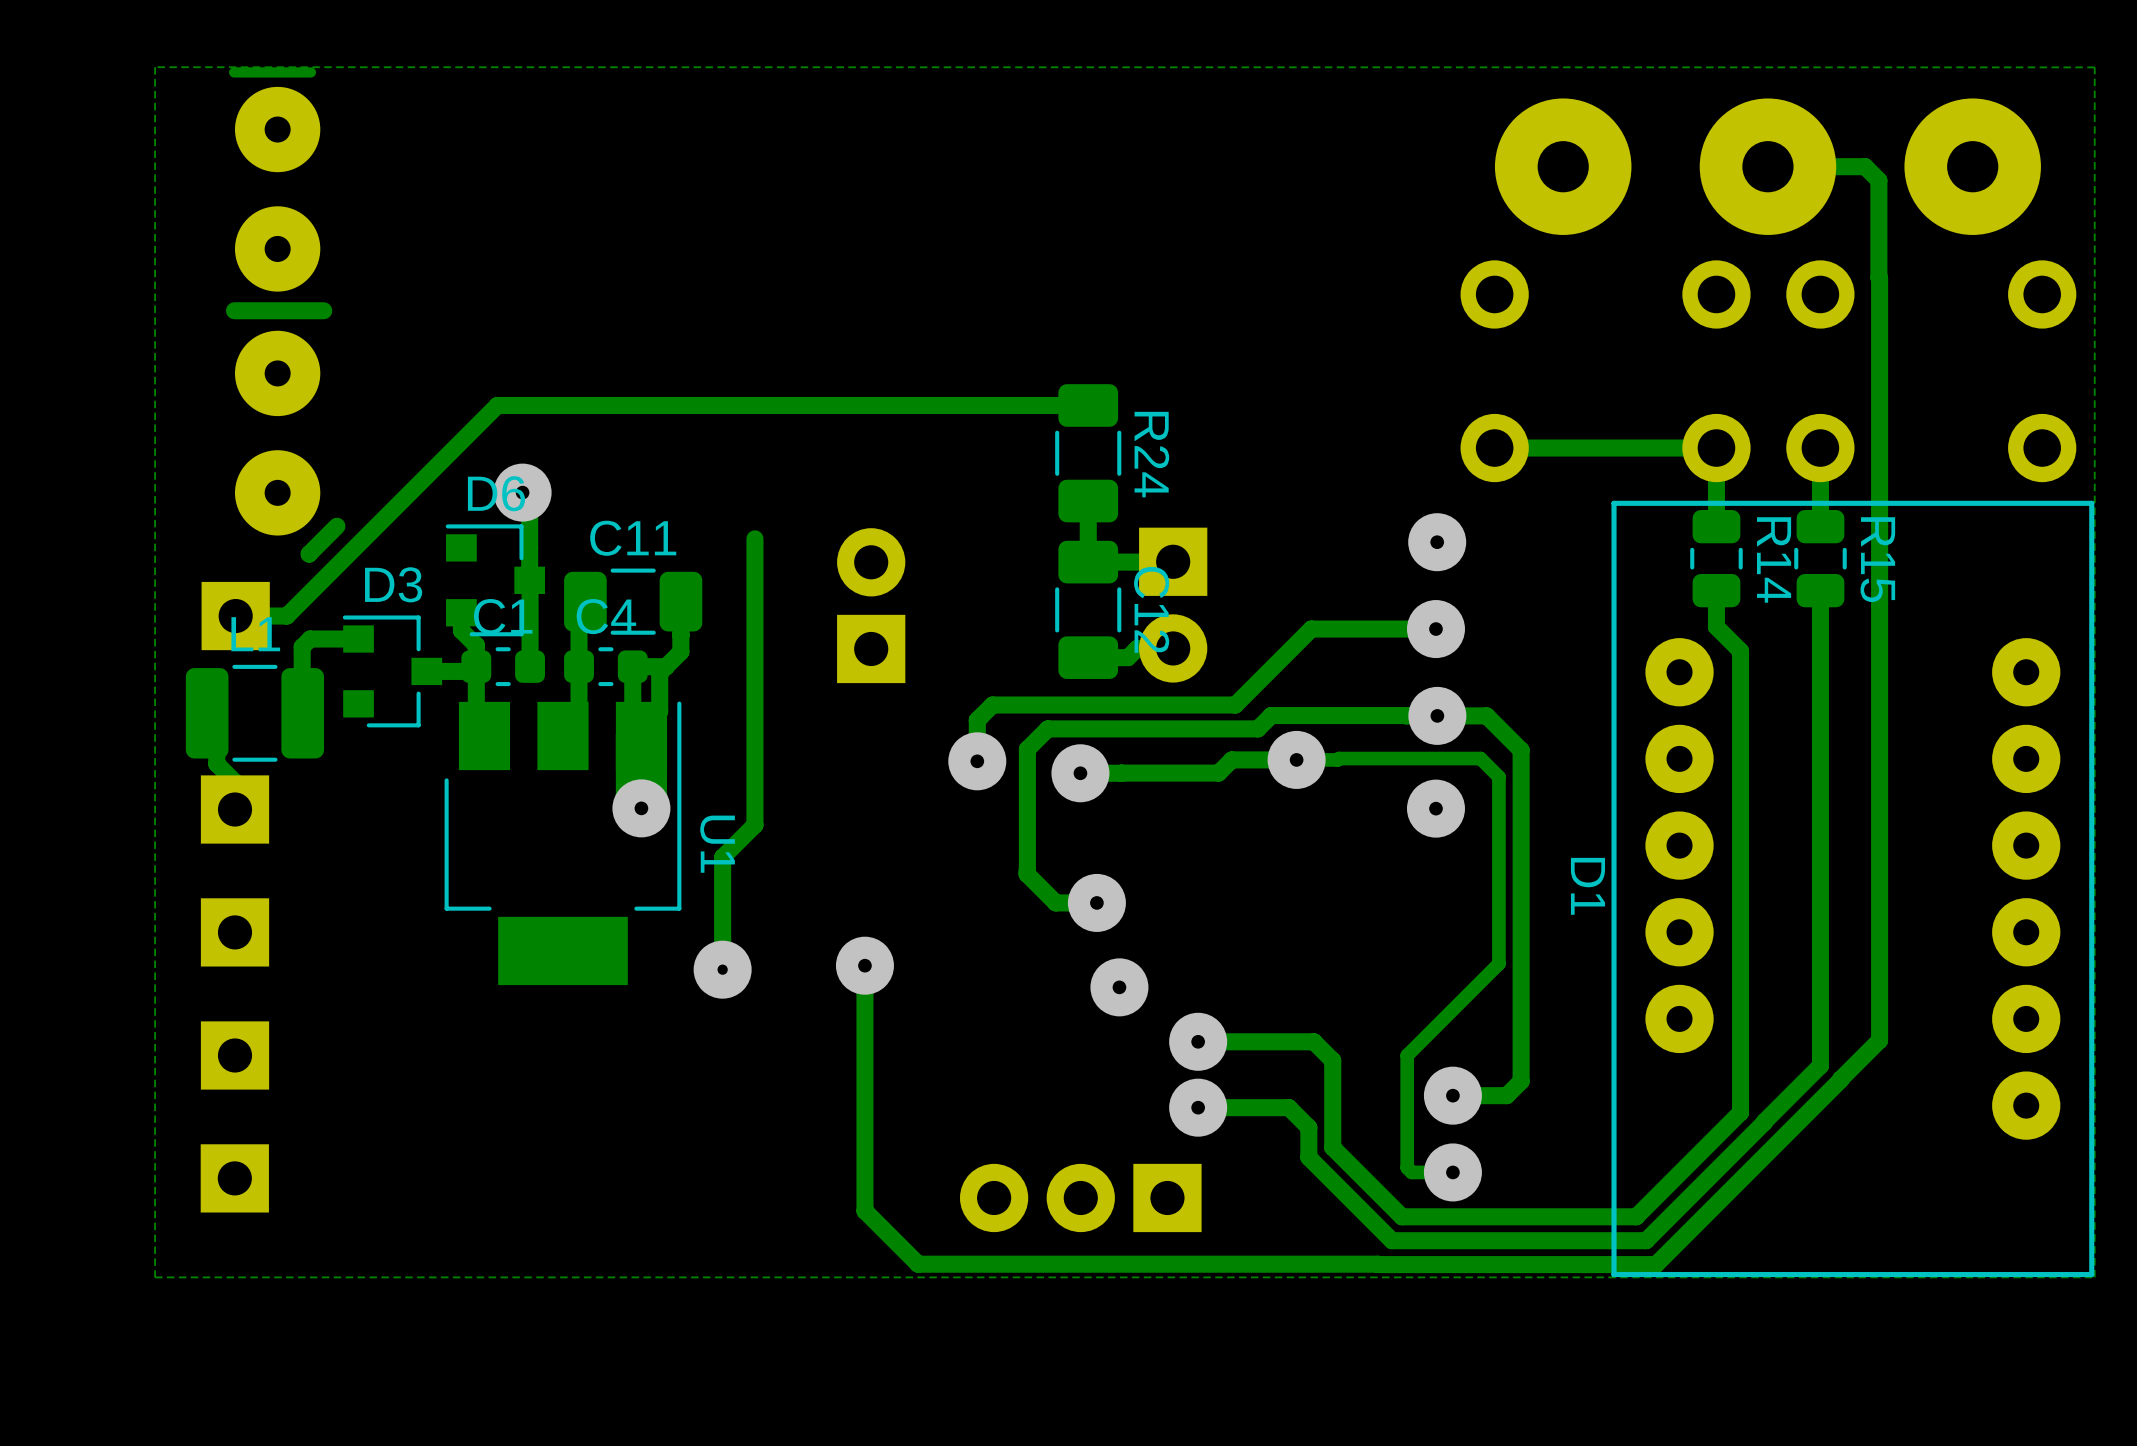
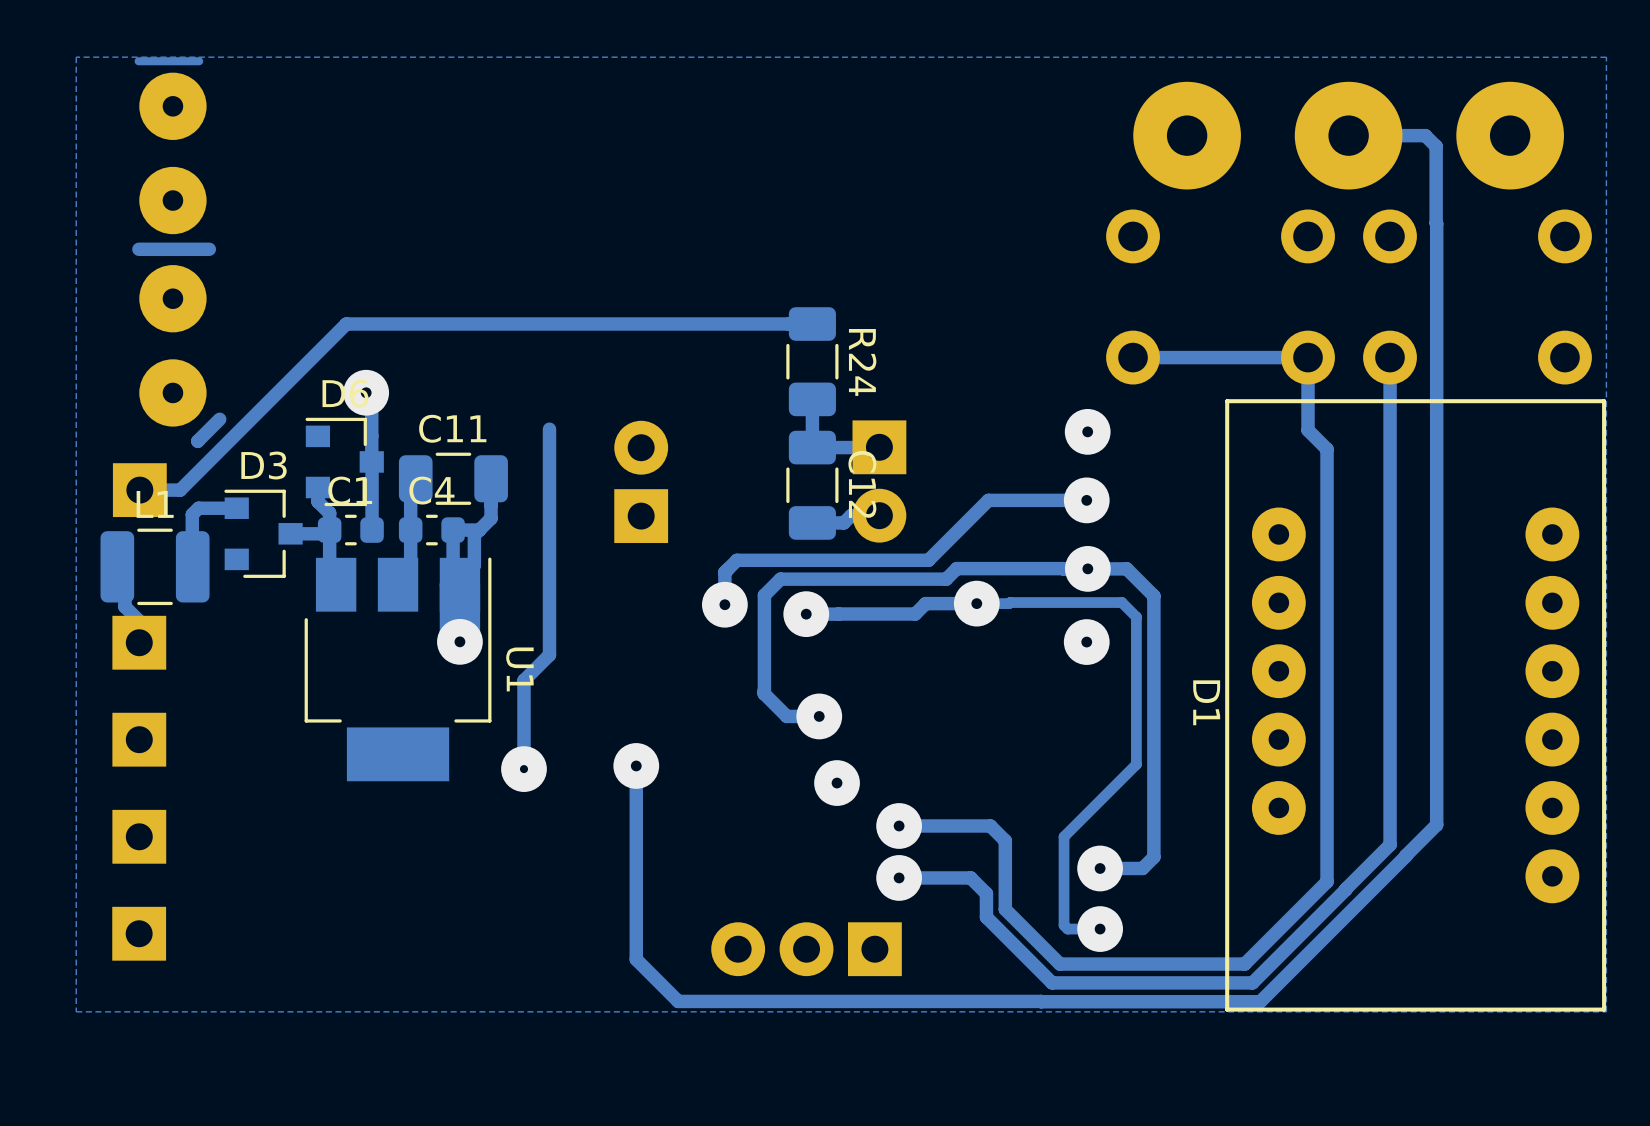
track: none -> (1390, 419) (1390, 470)
R14: (1716, 558) -> none
R15: (1820, 558) -> none
track: (1716, 590) (1716, 626) (1740, 651) -> (1308, 419) (1308, 430) (1327, 449) (1327, 517)

